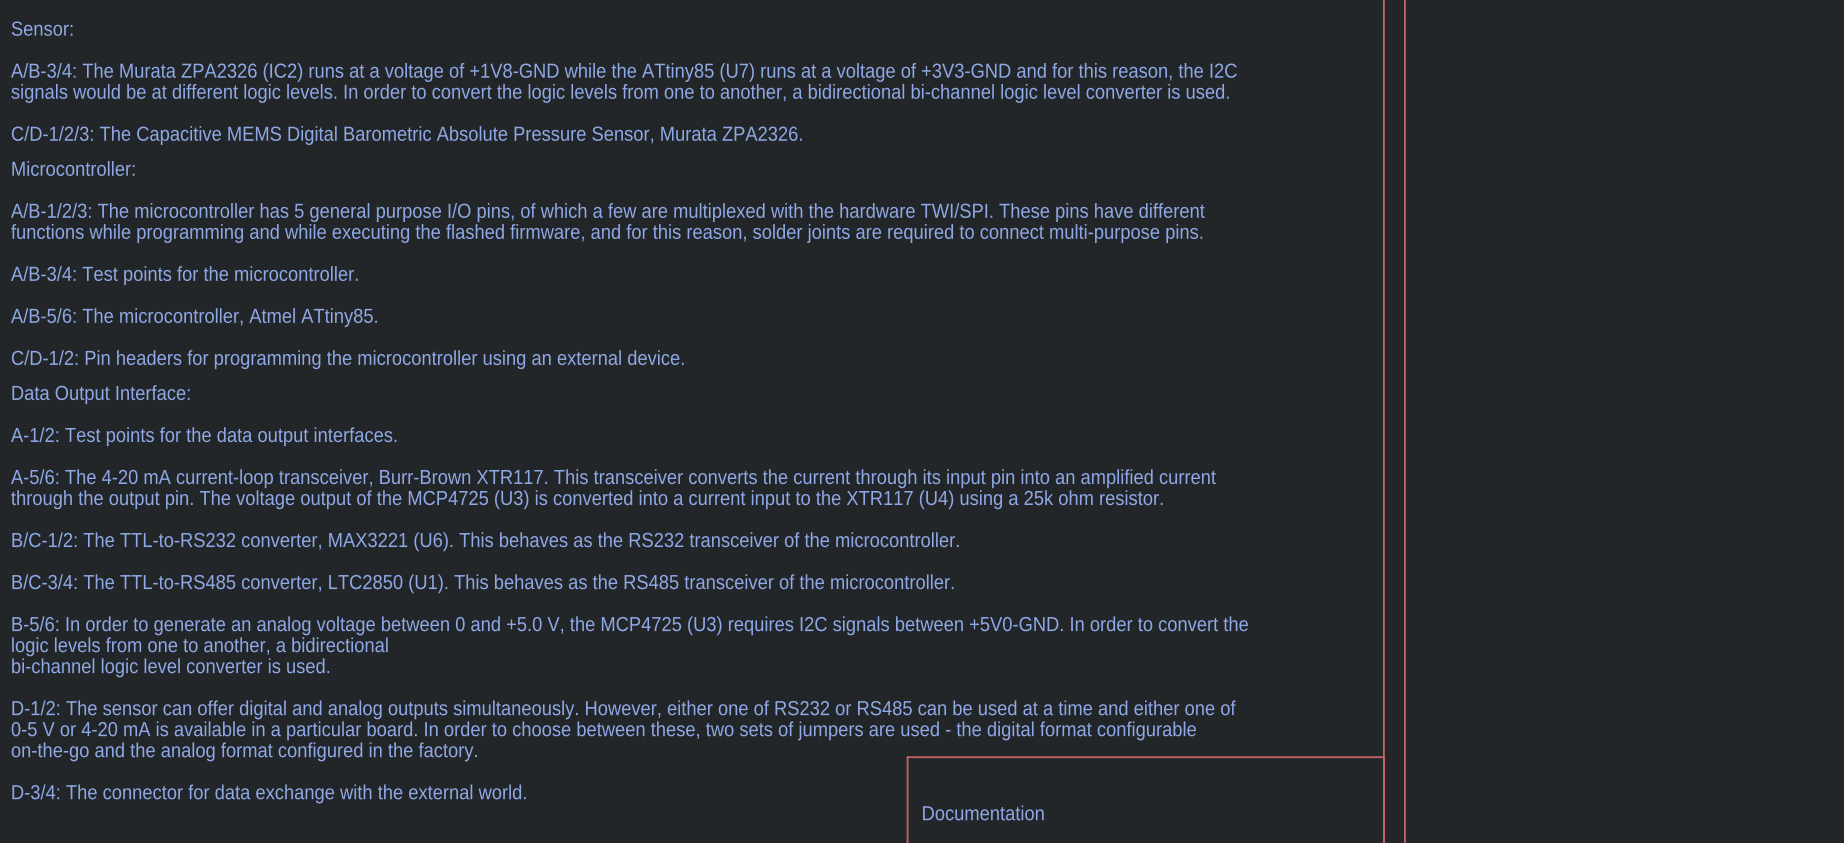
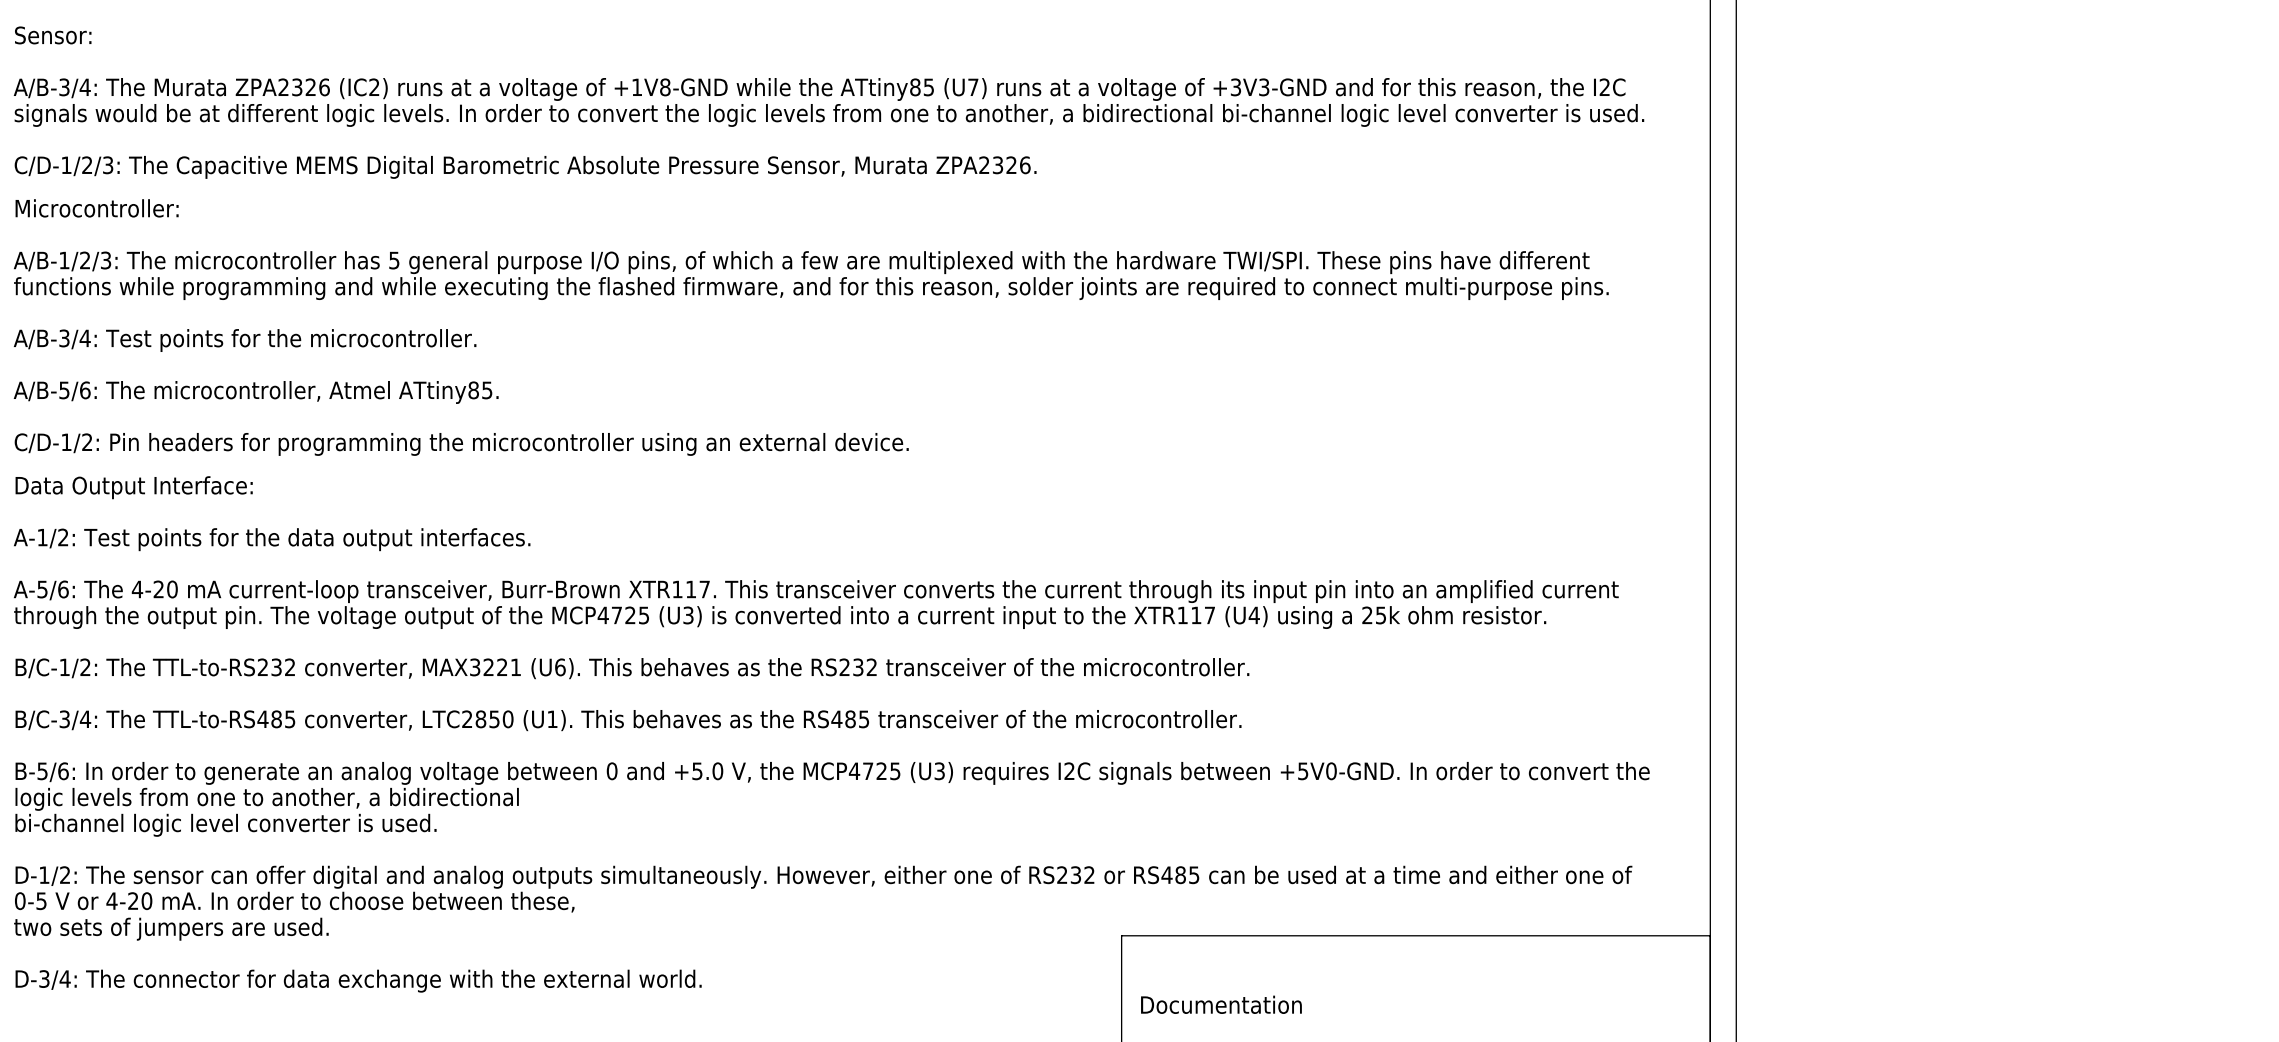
text: 0-5 V or 4-20 mA is available in a particular board. In order to choose between these, two sets of jumpers are used - the digital format configurable (603, 730) -> 0-5 V or 4-20 mA. In order to choose between these, (294, 902)
text: on-the-go and the analog format configured in the factory. (244, 751) -> two sets of jumpers are used. (171, 929)

